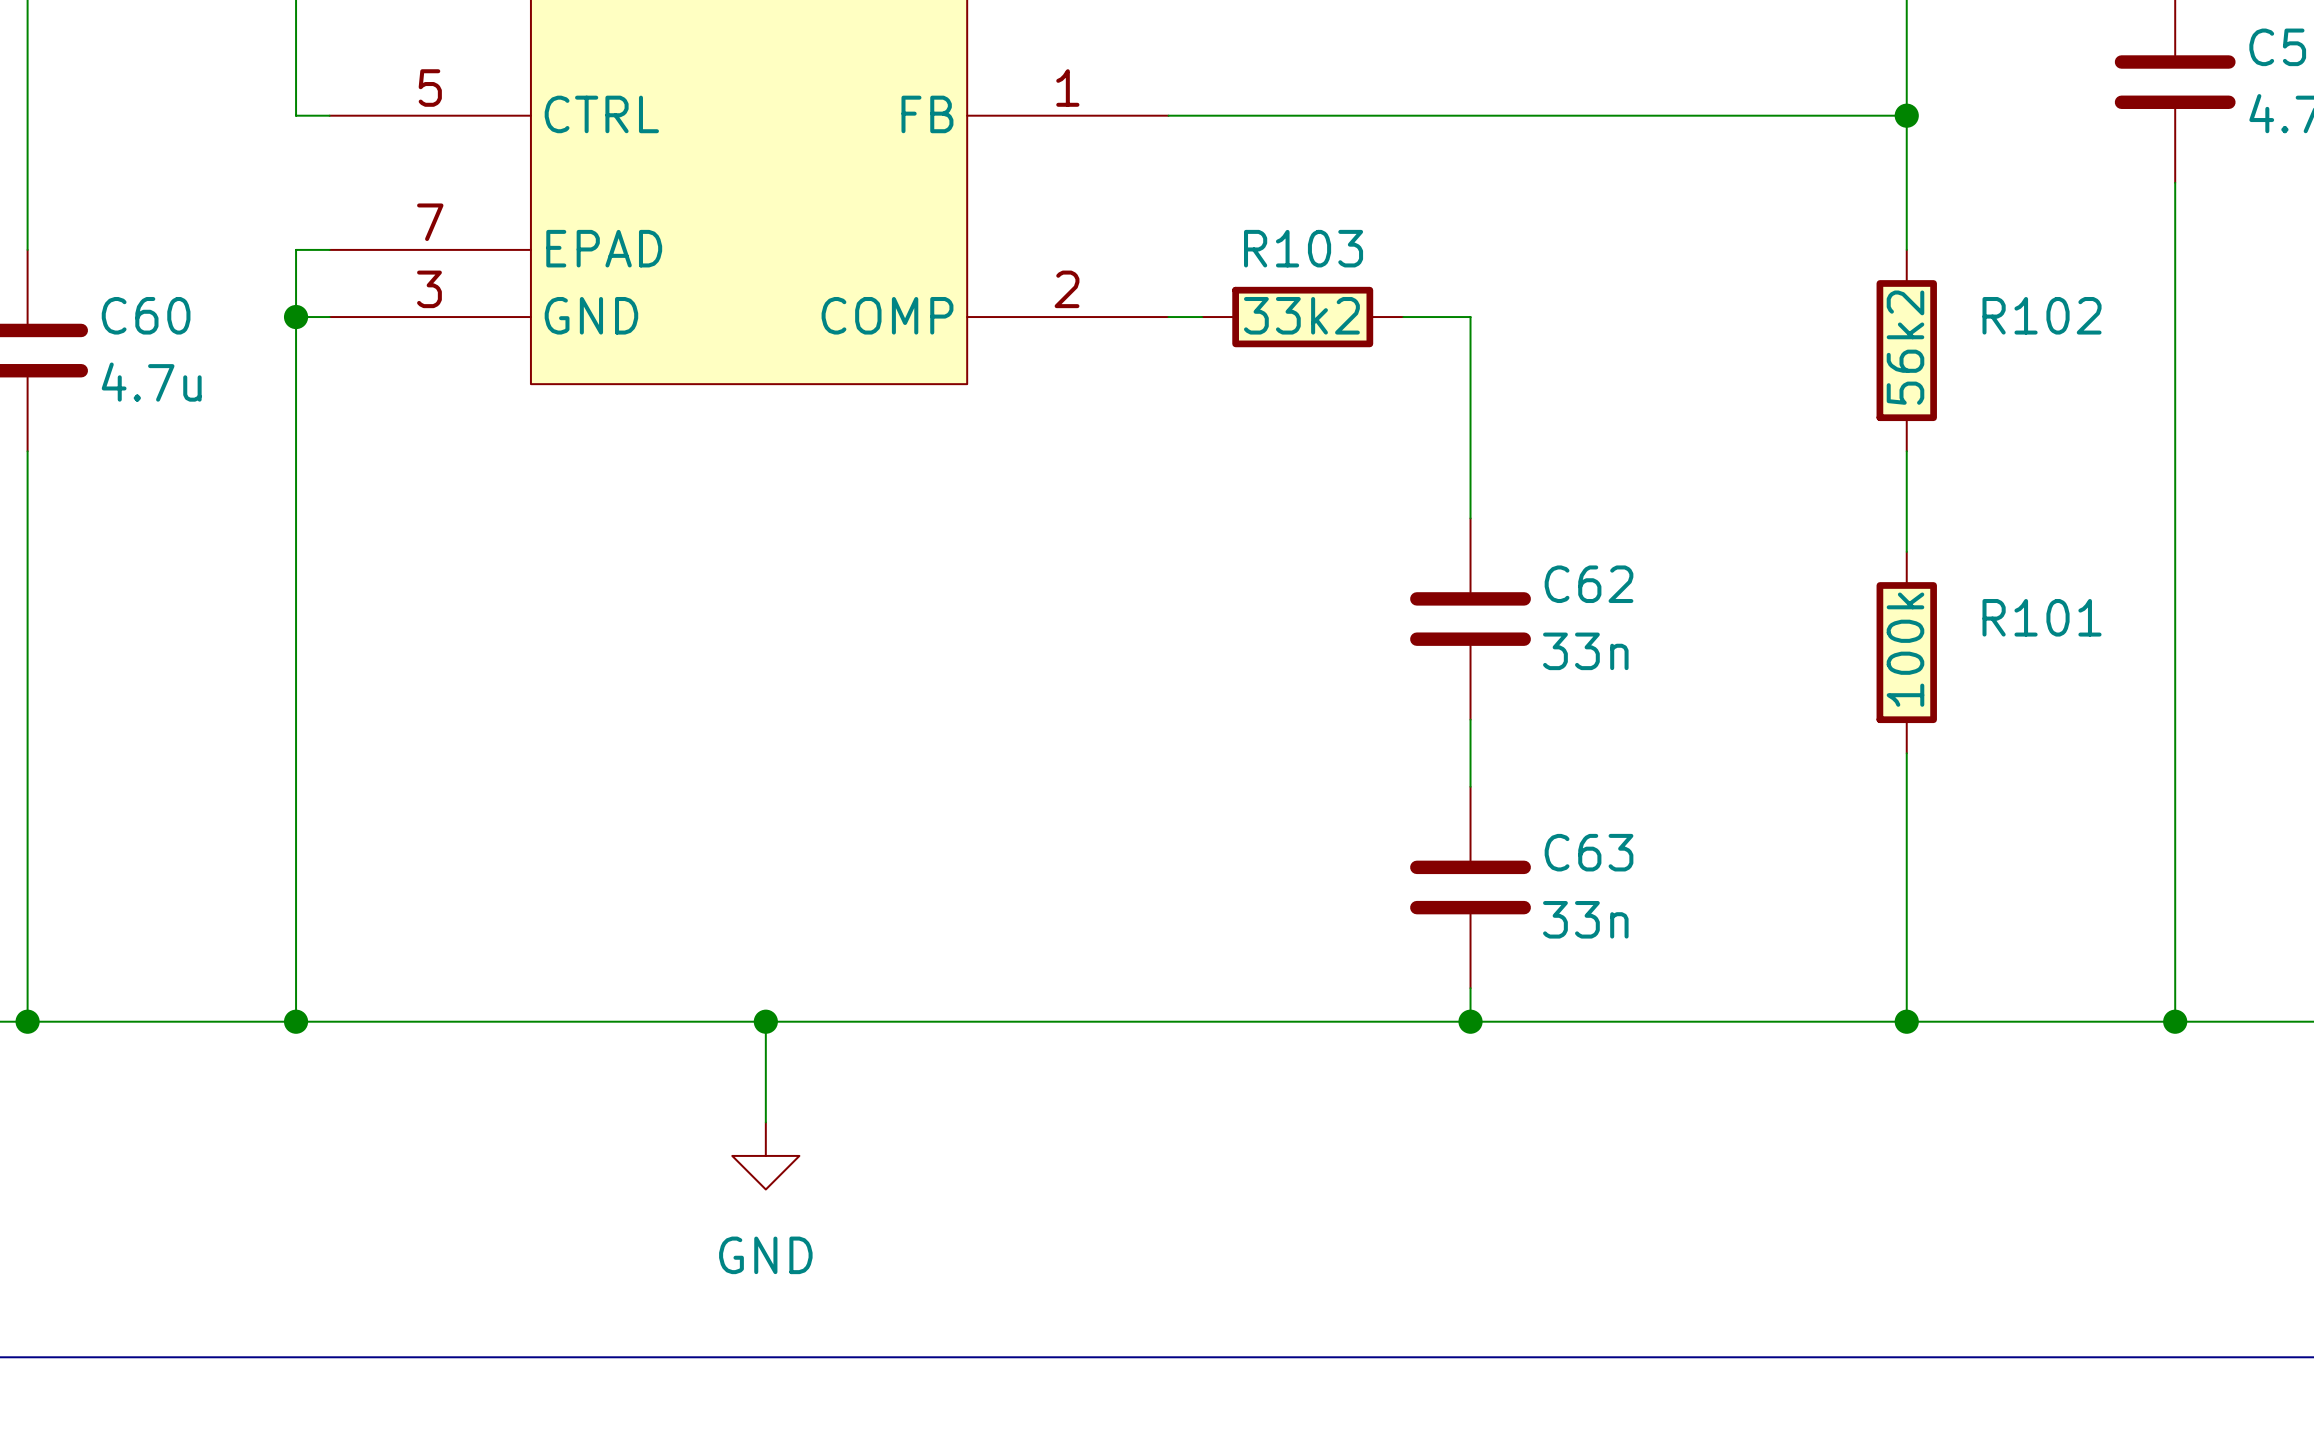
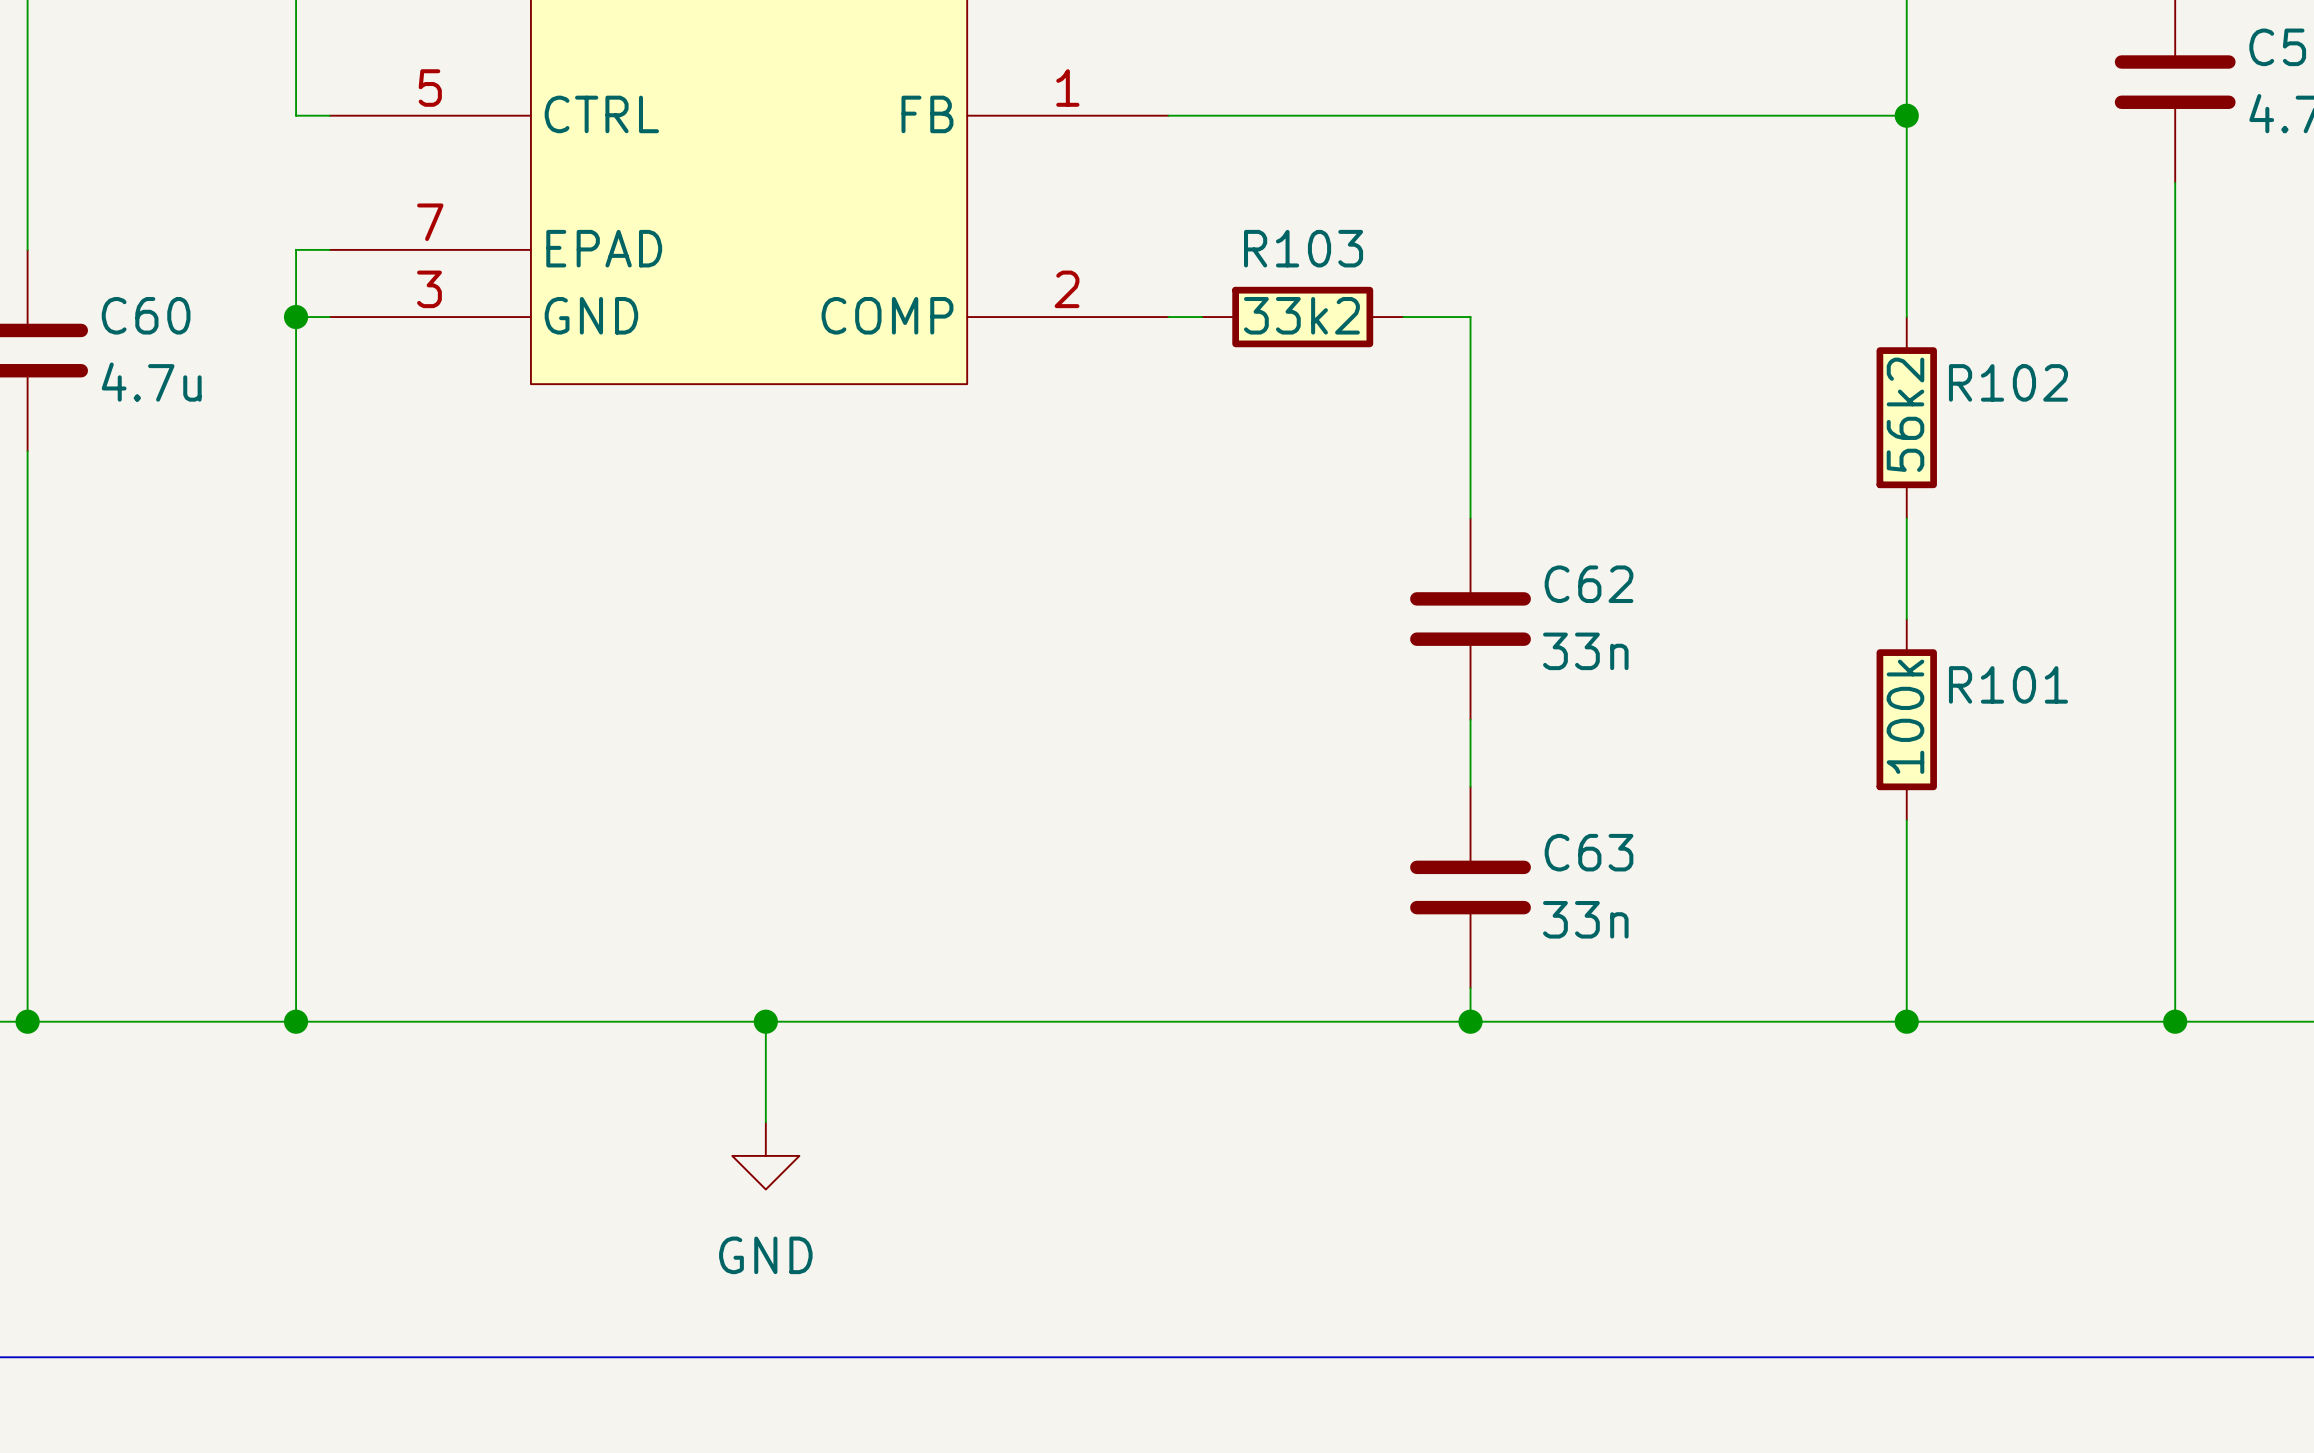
R102 name position: R102 (2042, 315) -> R102 (2008, 382)
R102 position: (1906, 350) -> (1906, 417)
R101 name position: R101 (2042, 617) -> R101 (2008, 684)
R101 position: (1906, 652) -> (1906, 719)

